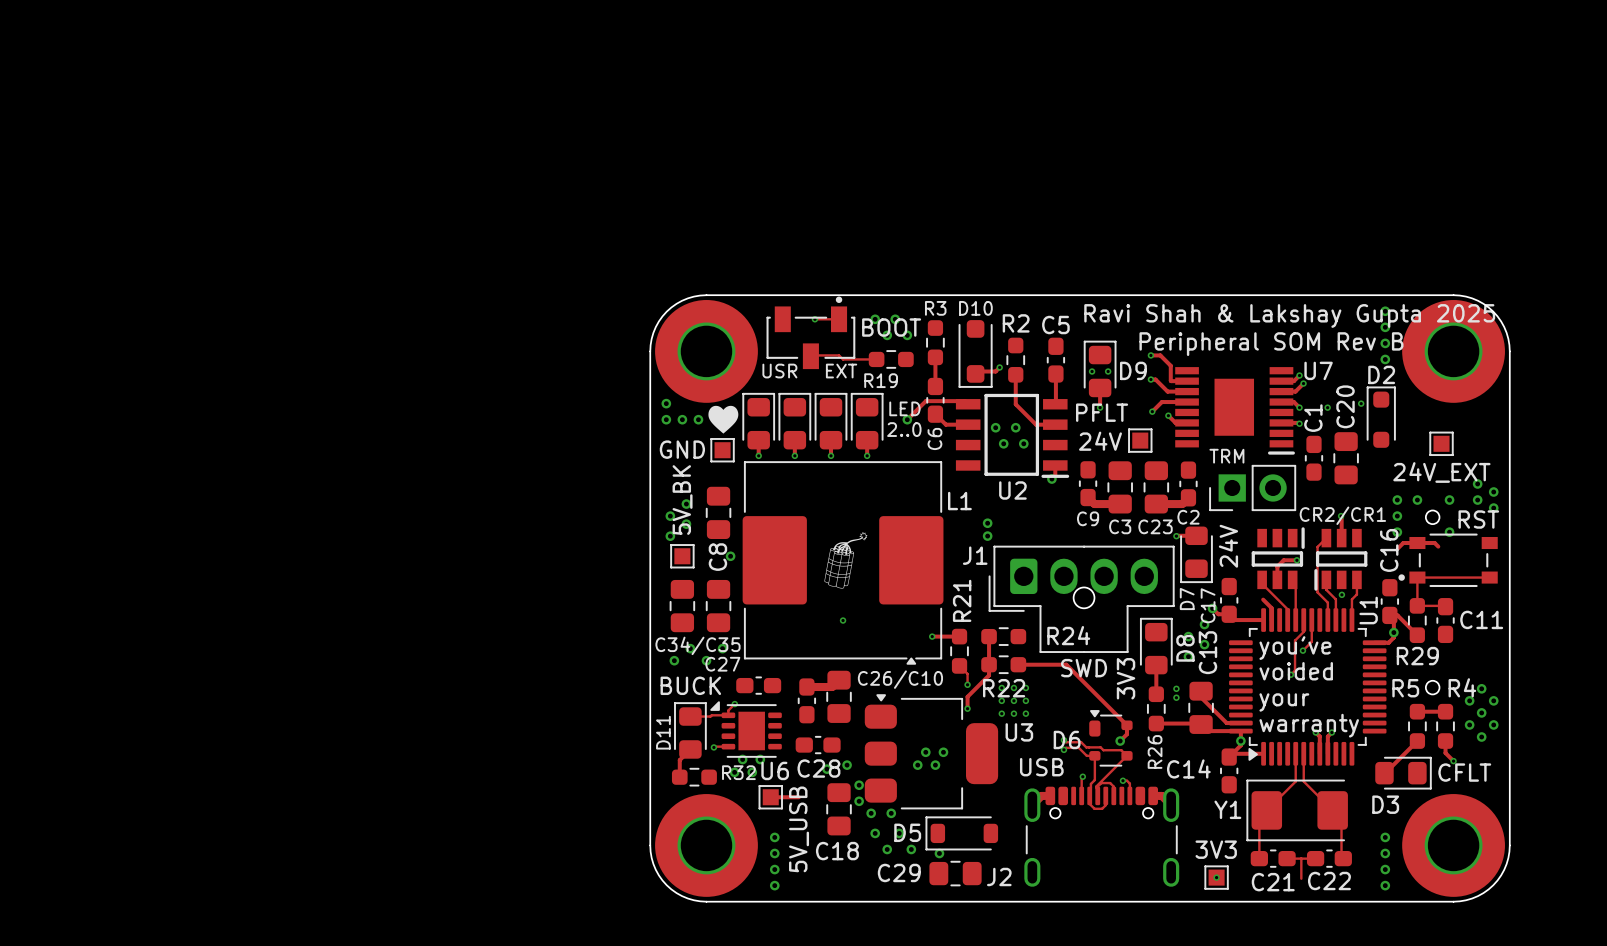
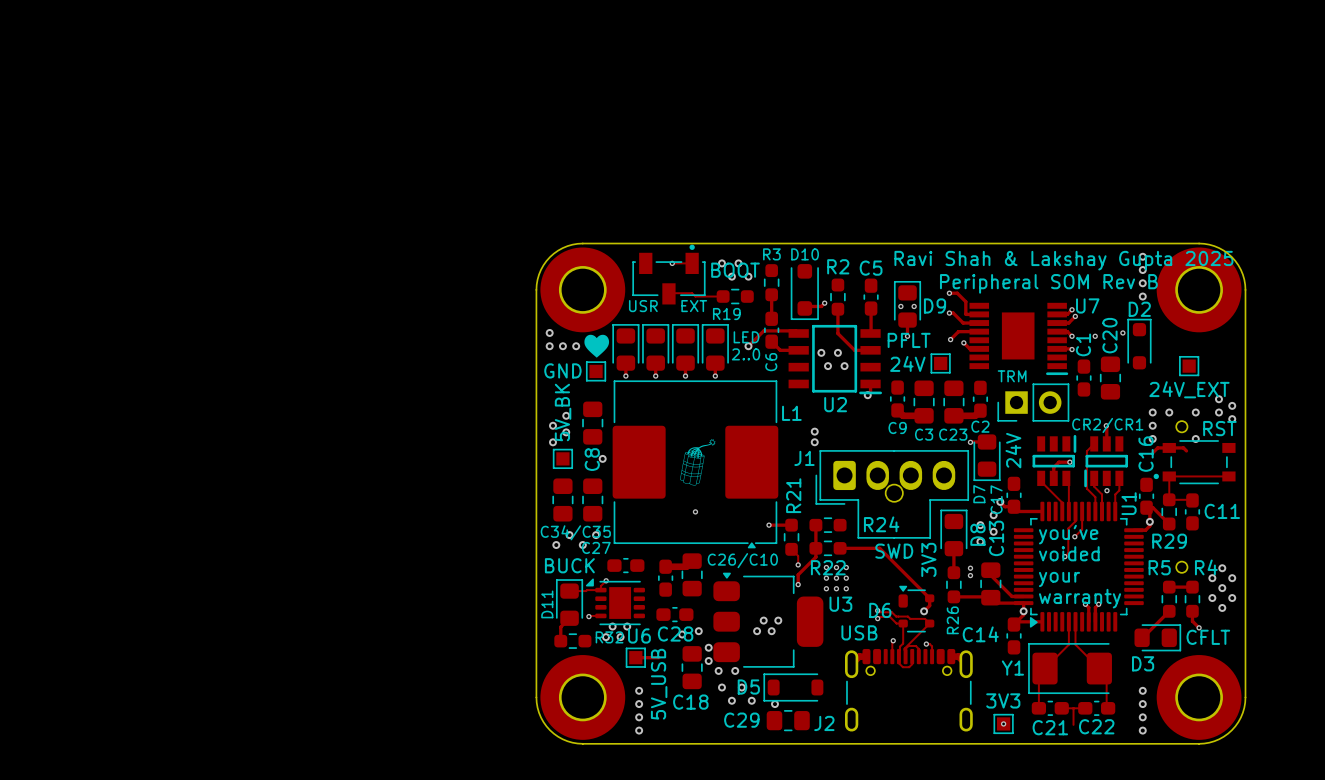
track: (1263, 599) (1271, 608) (1271, 620) -> none

